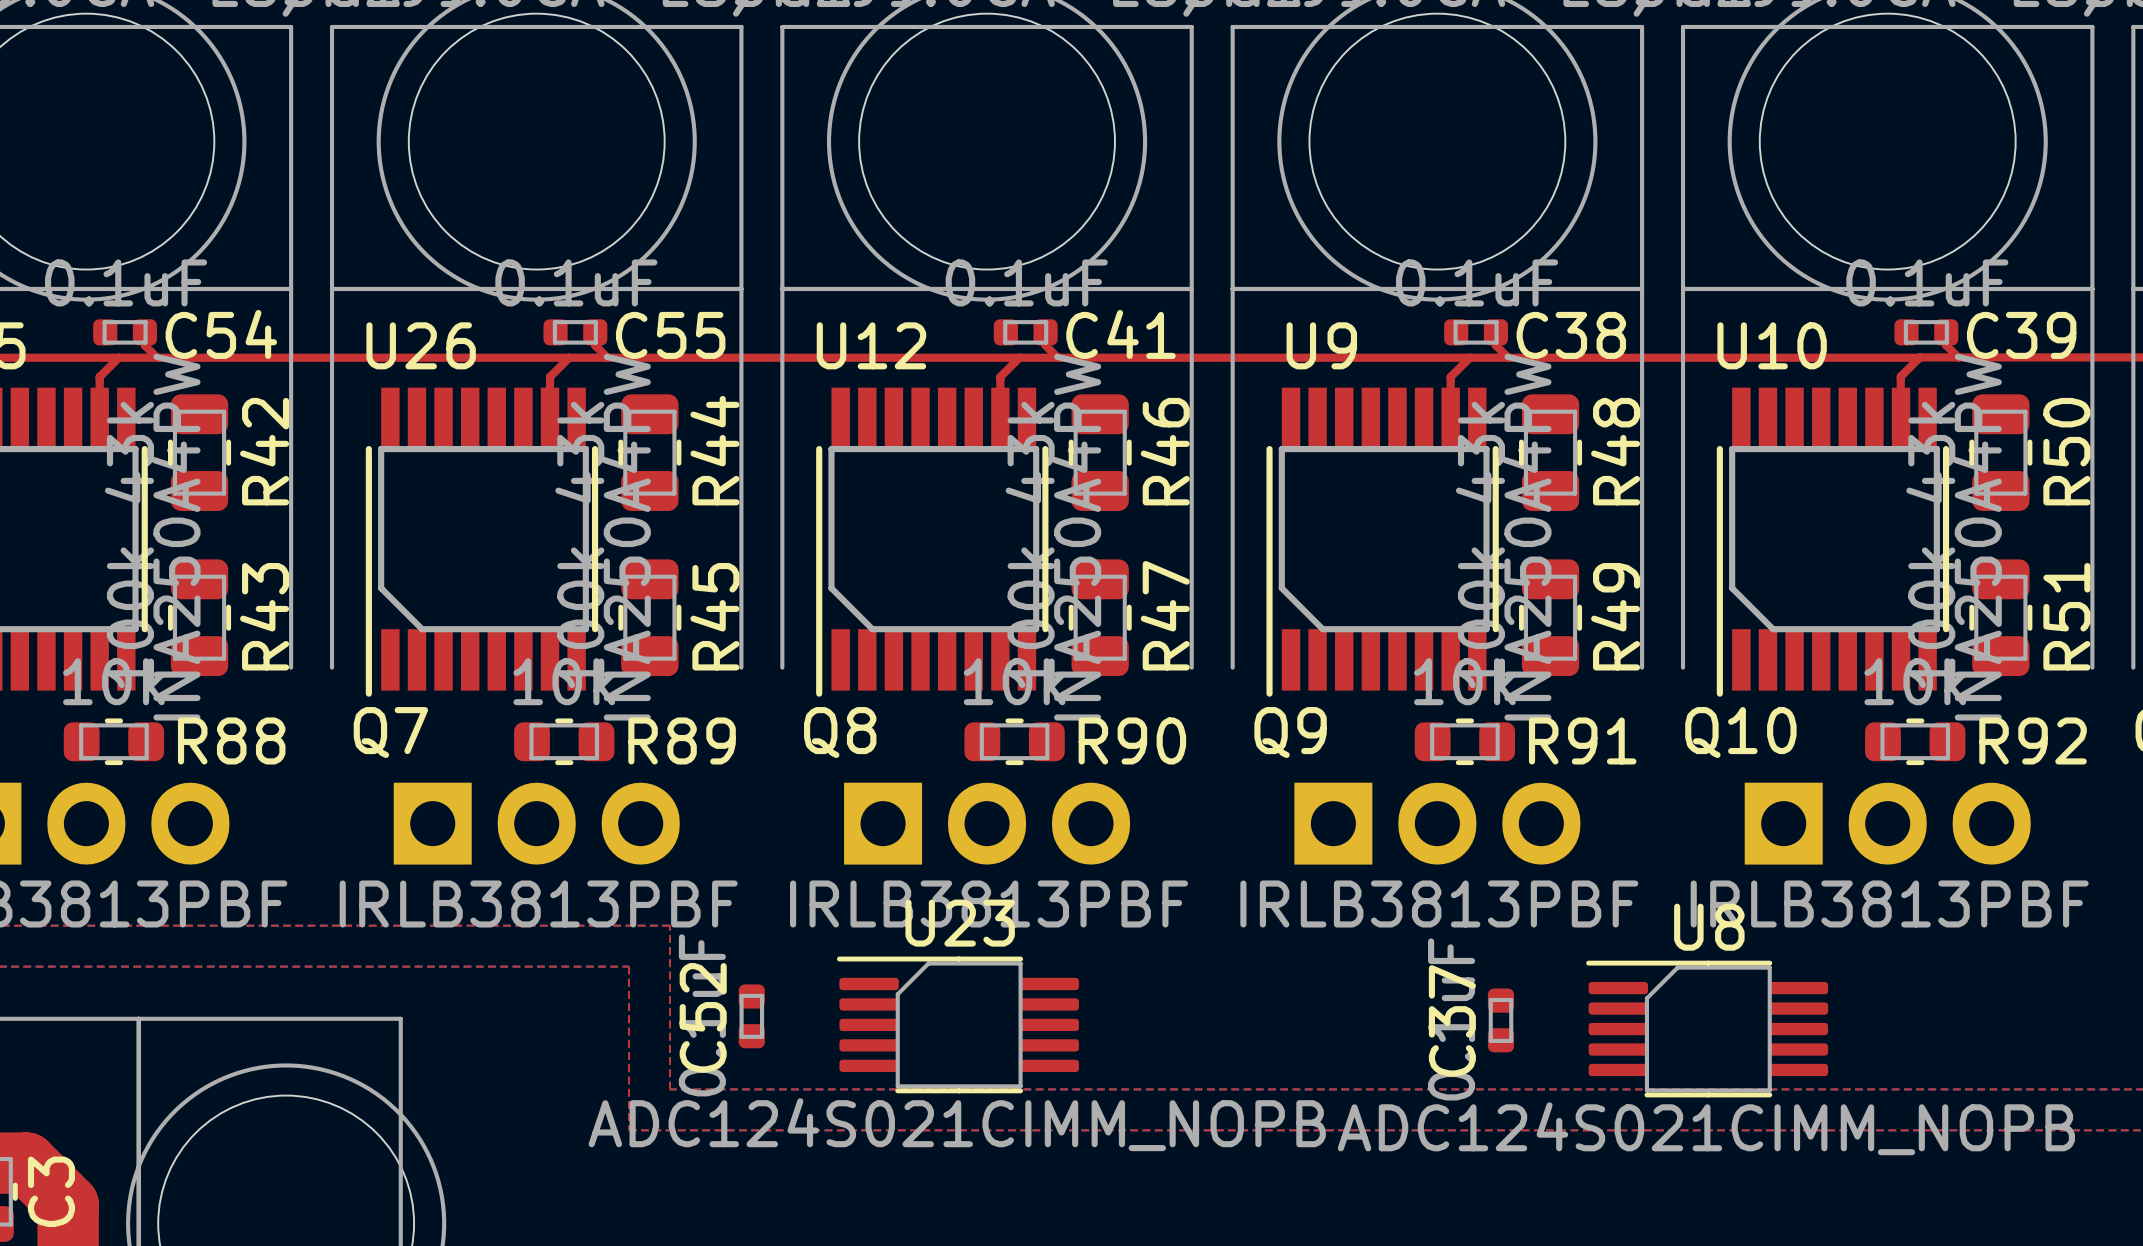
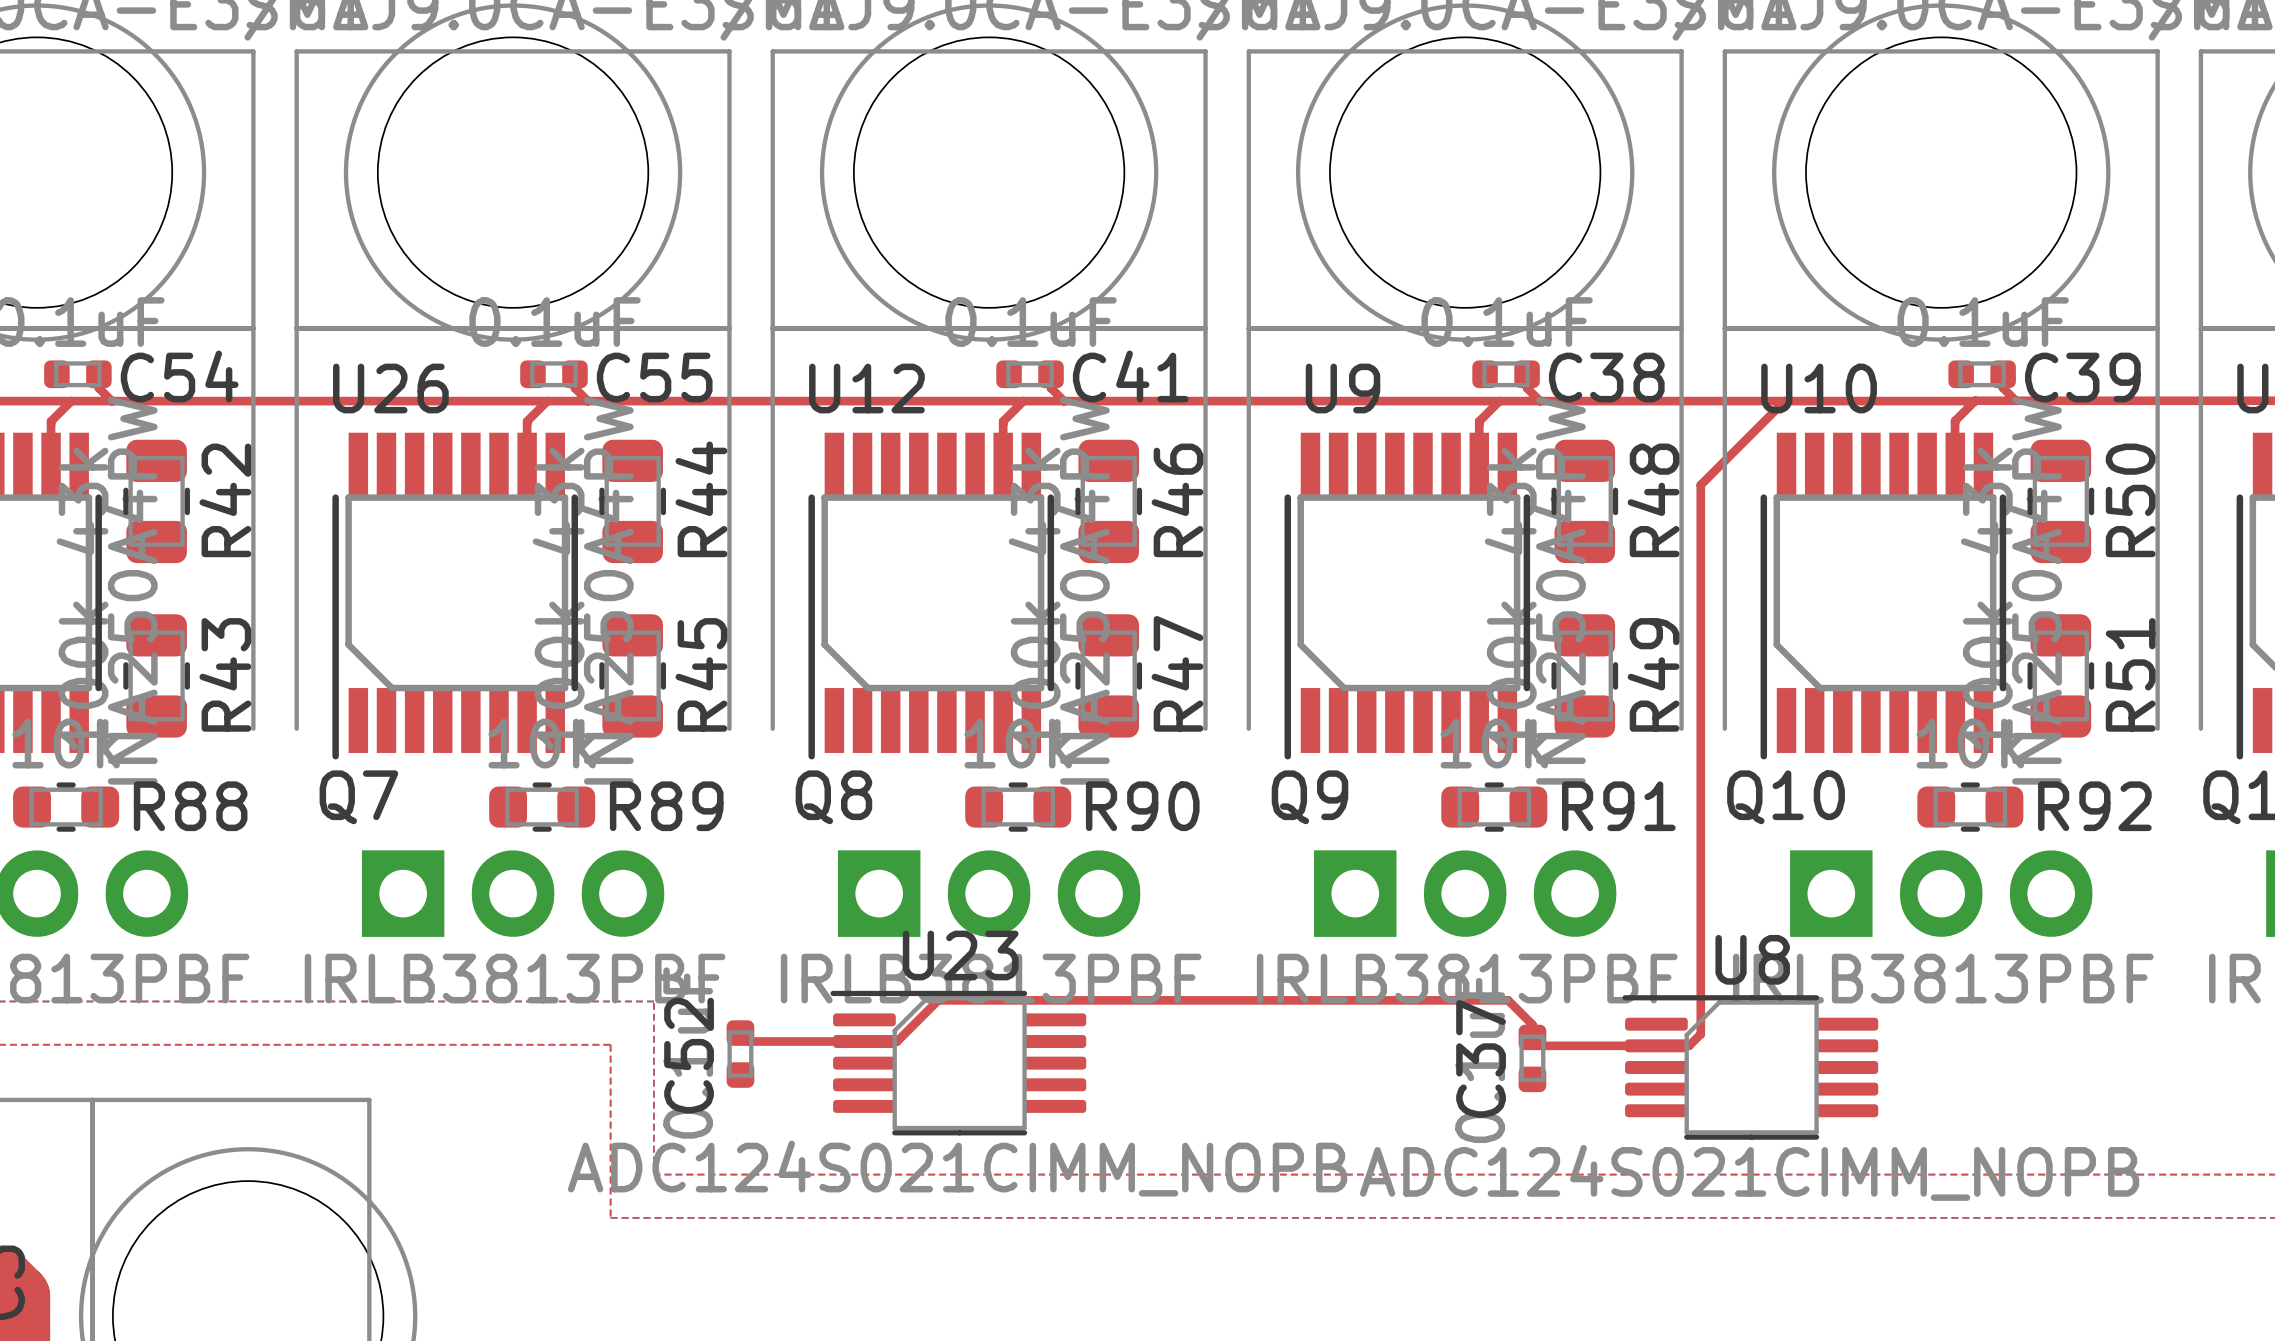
top track: none -> (1784, 401) (1700, 484) (1700, 1034) (1689, 1045) (1540, 1045) (1532, 1037) (1532, 1024) (1508, 1000) (938, 1000) (897, 1041) (748, 1041) (740, 1033)
C52 position: (751, 1016) -> (740, 1054)
C37 position: (1501, 1020) -> (1532, 1058)
U23 position: (957, 1024) -> (958, 1063)
U8 position: (1707, 1029) -> (1750, 1067)

